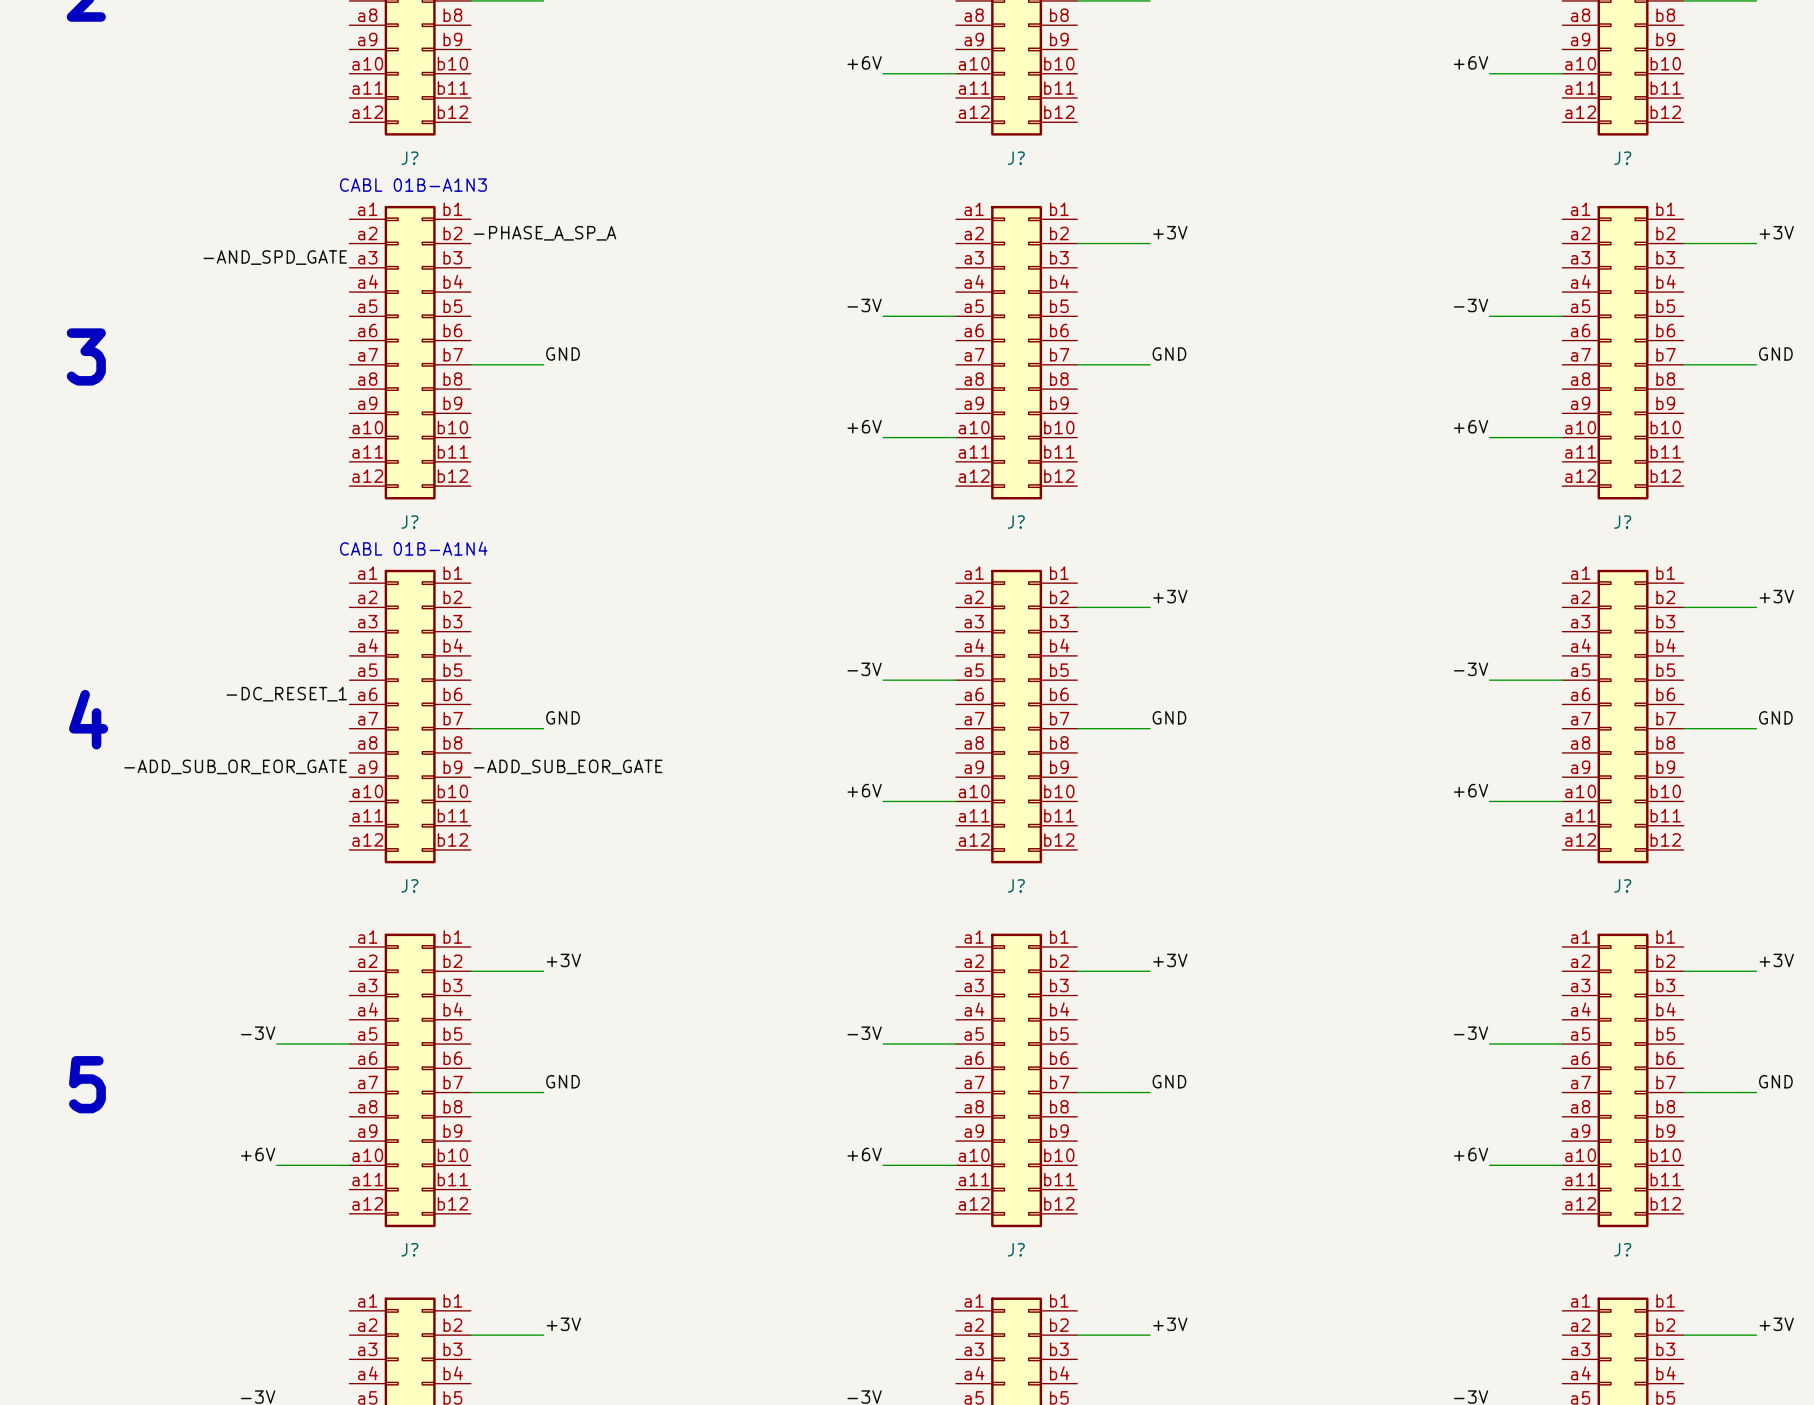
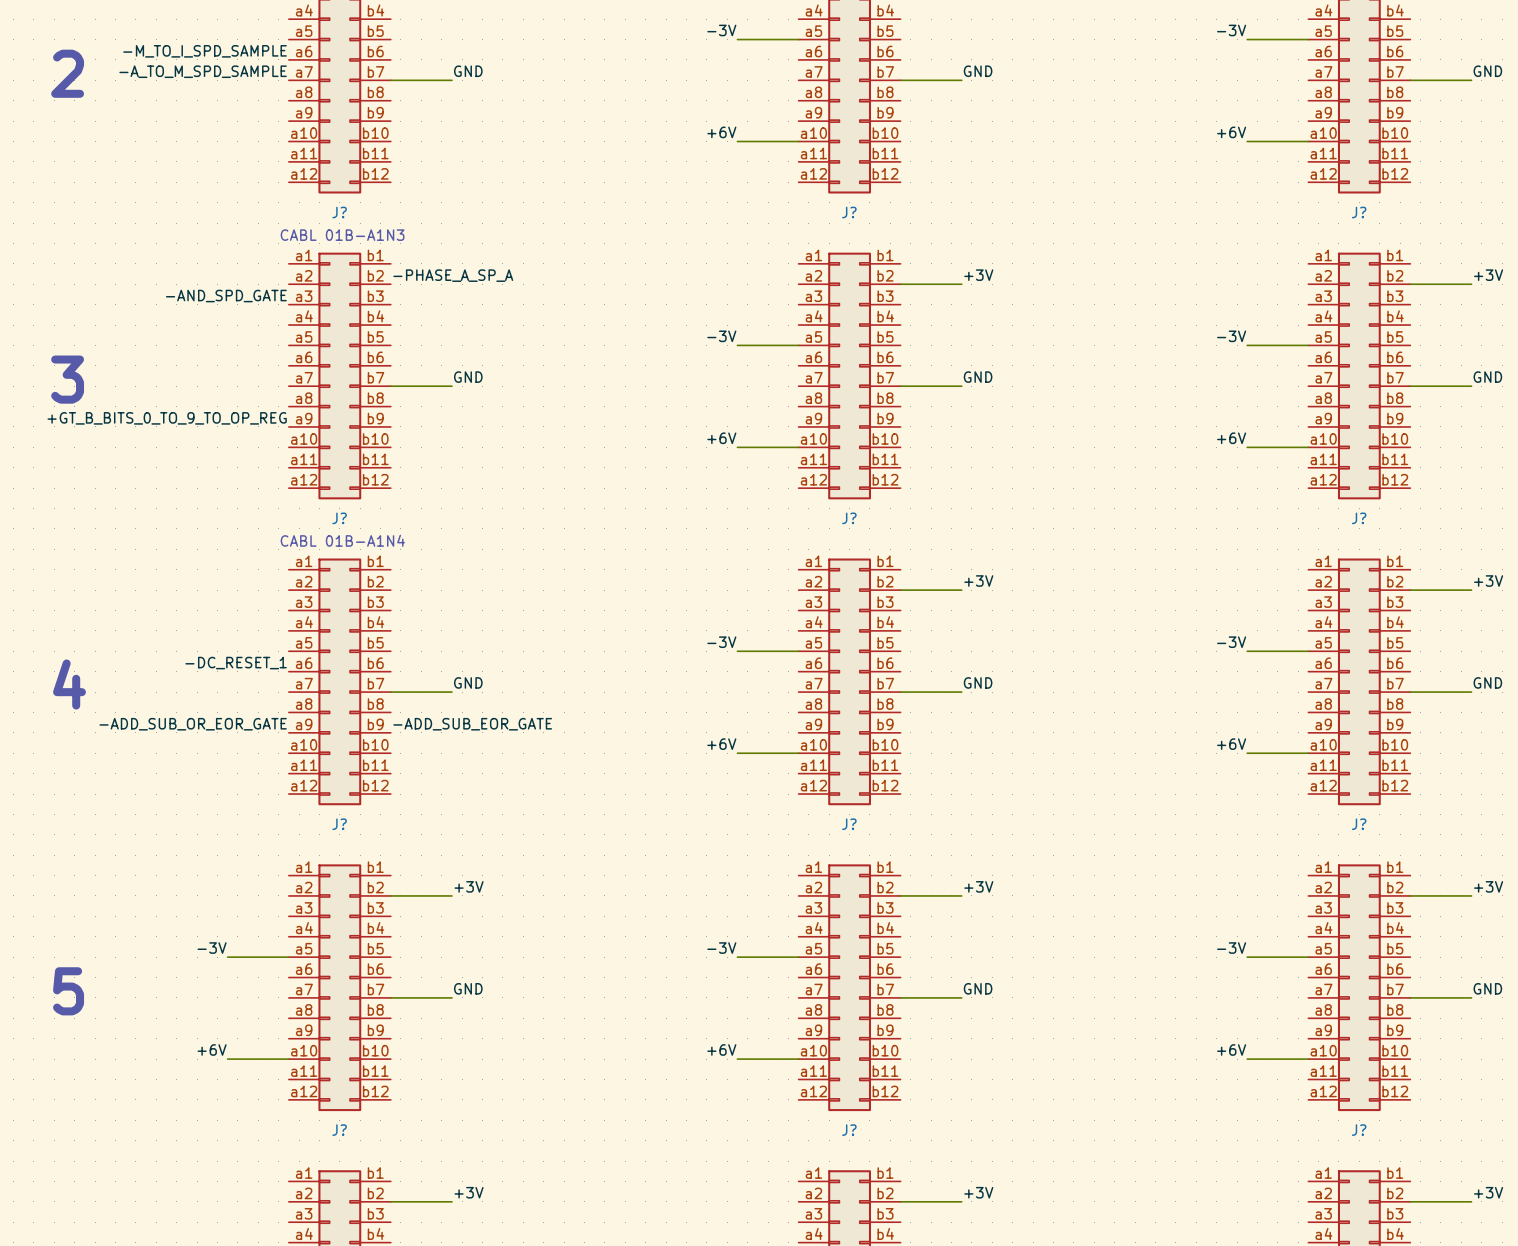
label: none -> +GT_B_BITS_0_TO_9_TO_OP_REG (167, 418)

